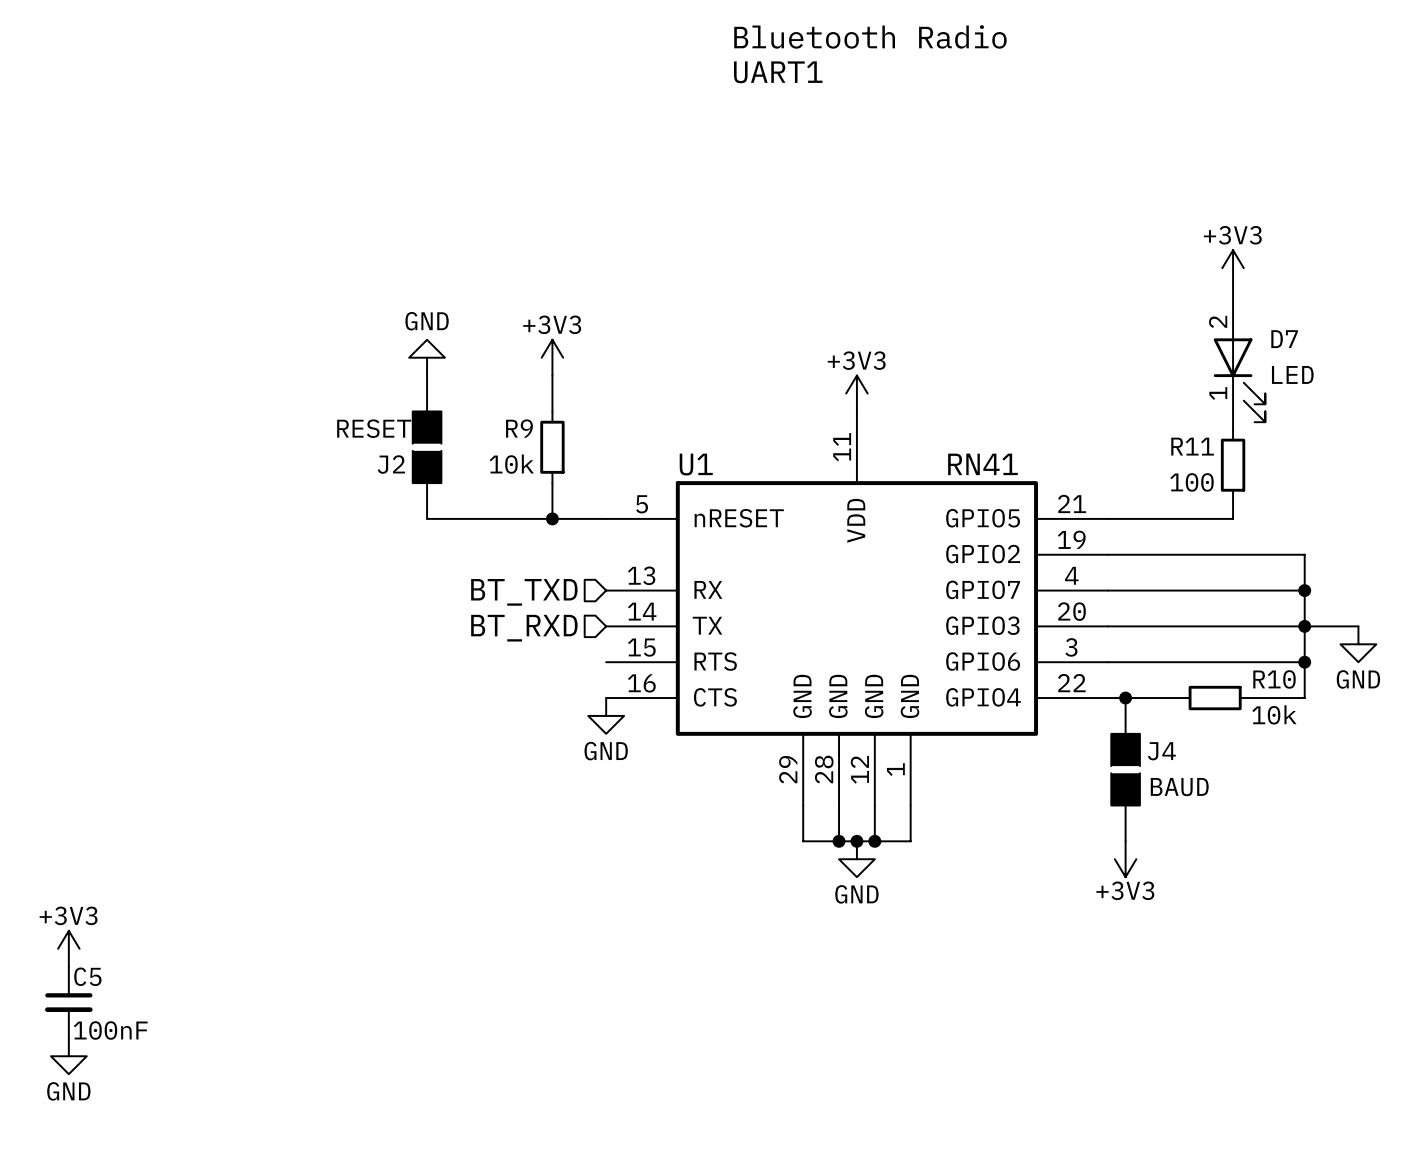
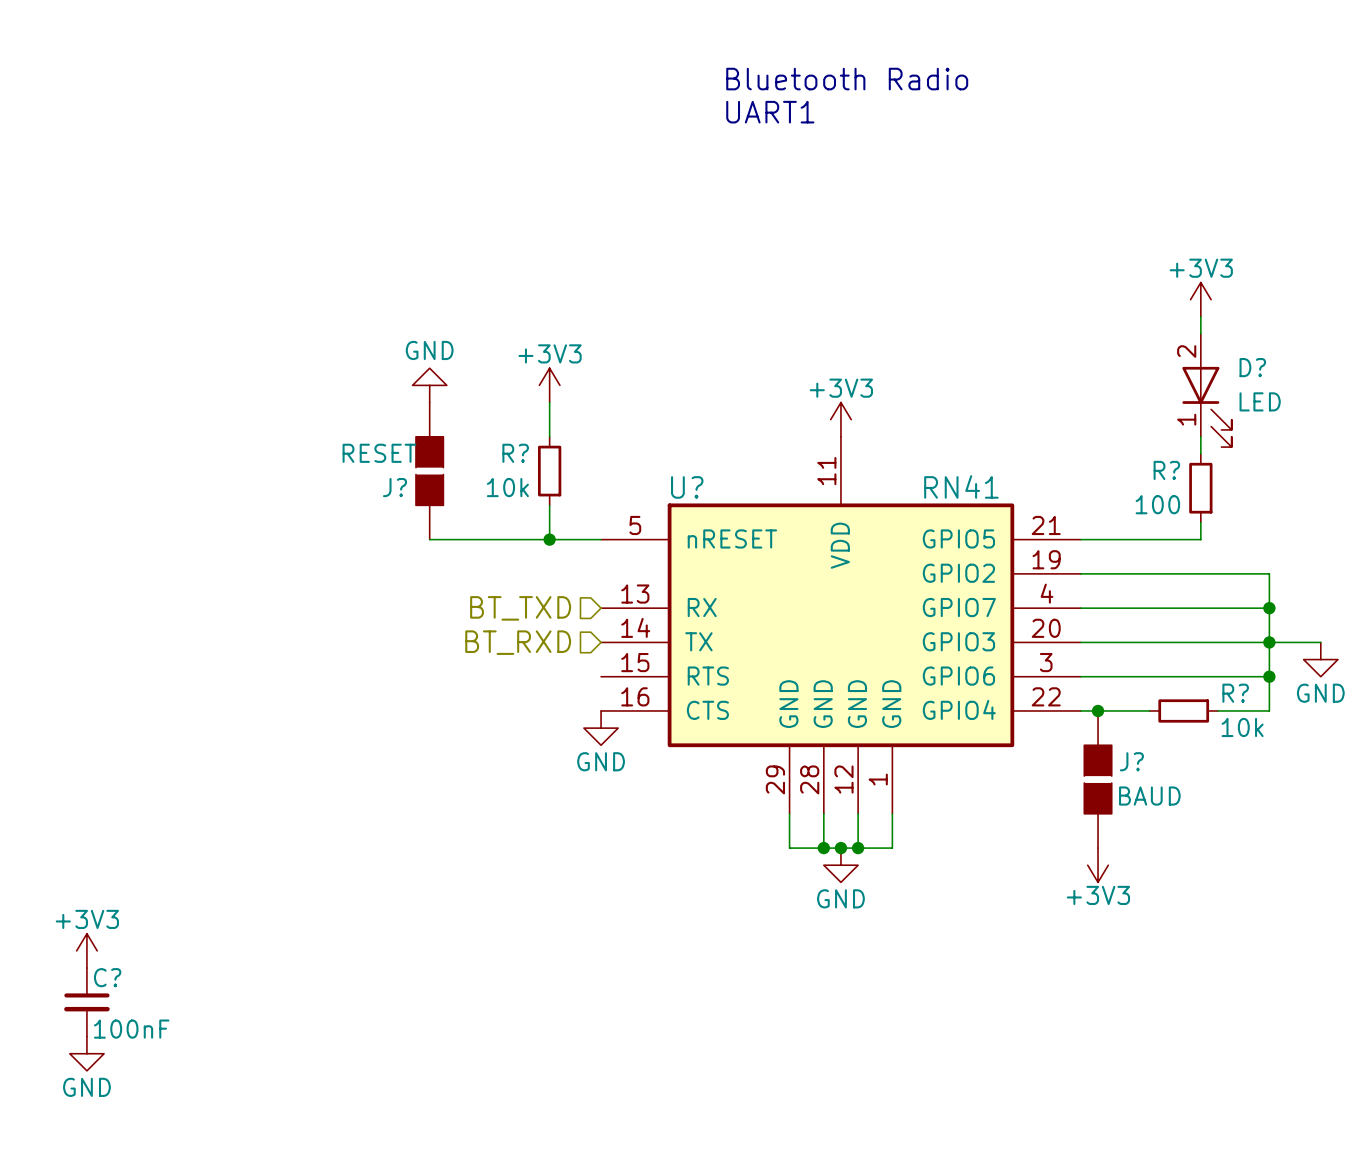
D7 name: D7 (1284, 339) -> D? (1252, 367)
R9 name: R9 (519, 428) -> R? (515, 453)
R11 name: R11 (1192, 446) -> R? (1166, 470)
J2 name: J2 (391, 464) -> J? (395, 487)
U1 name: U1 (696, 464) -> U? (687, 487)
R10 name: R10 (1274, 679) -> R? (1235, 693)
J4 name: J4 (1161, 751) -> J? (1131, 761)
C5 name: C5 (87, 976) -> C? (107, 977)

